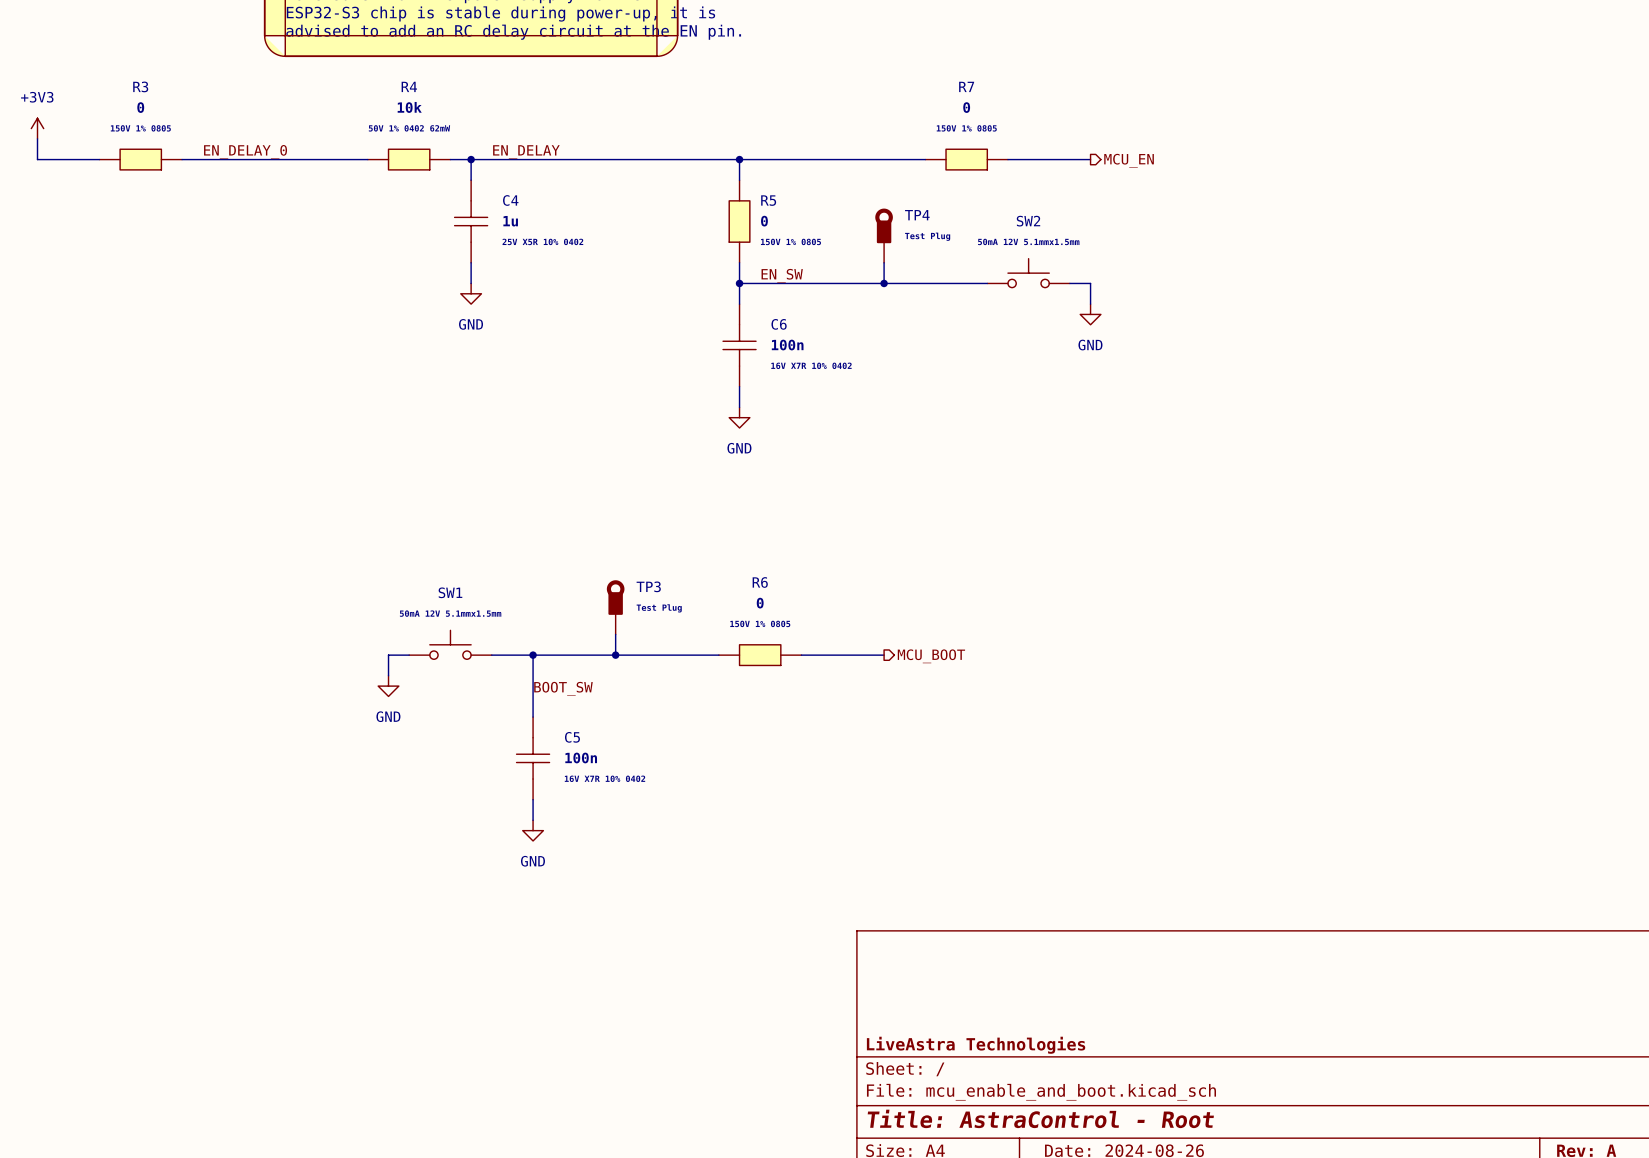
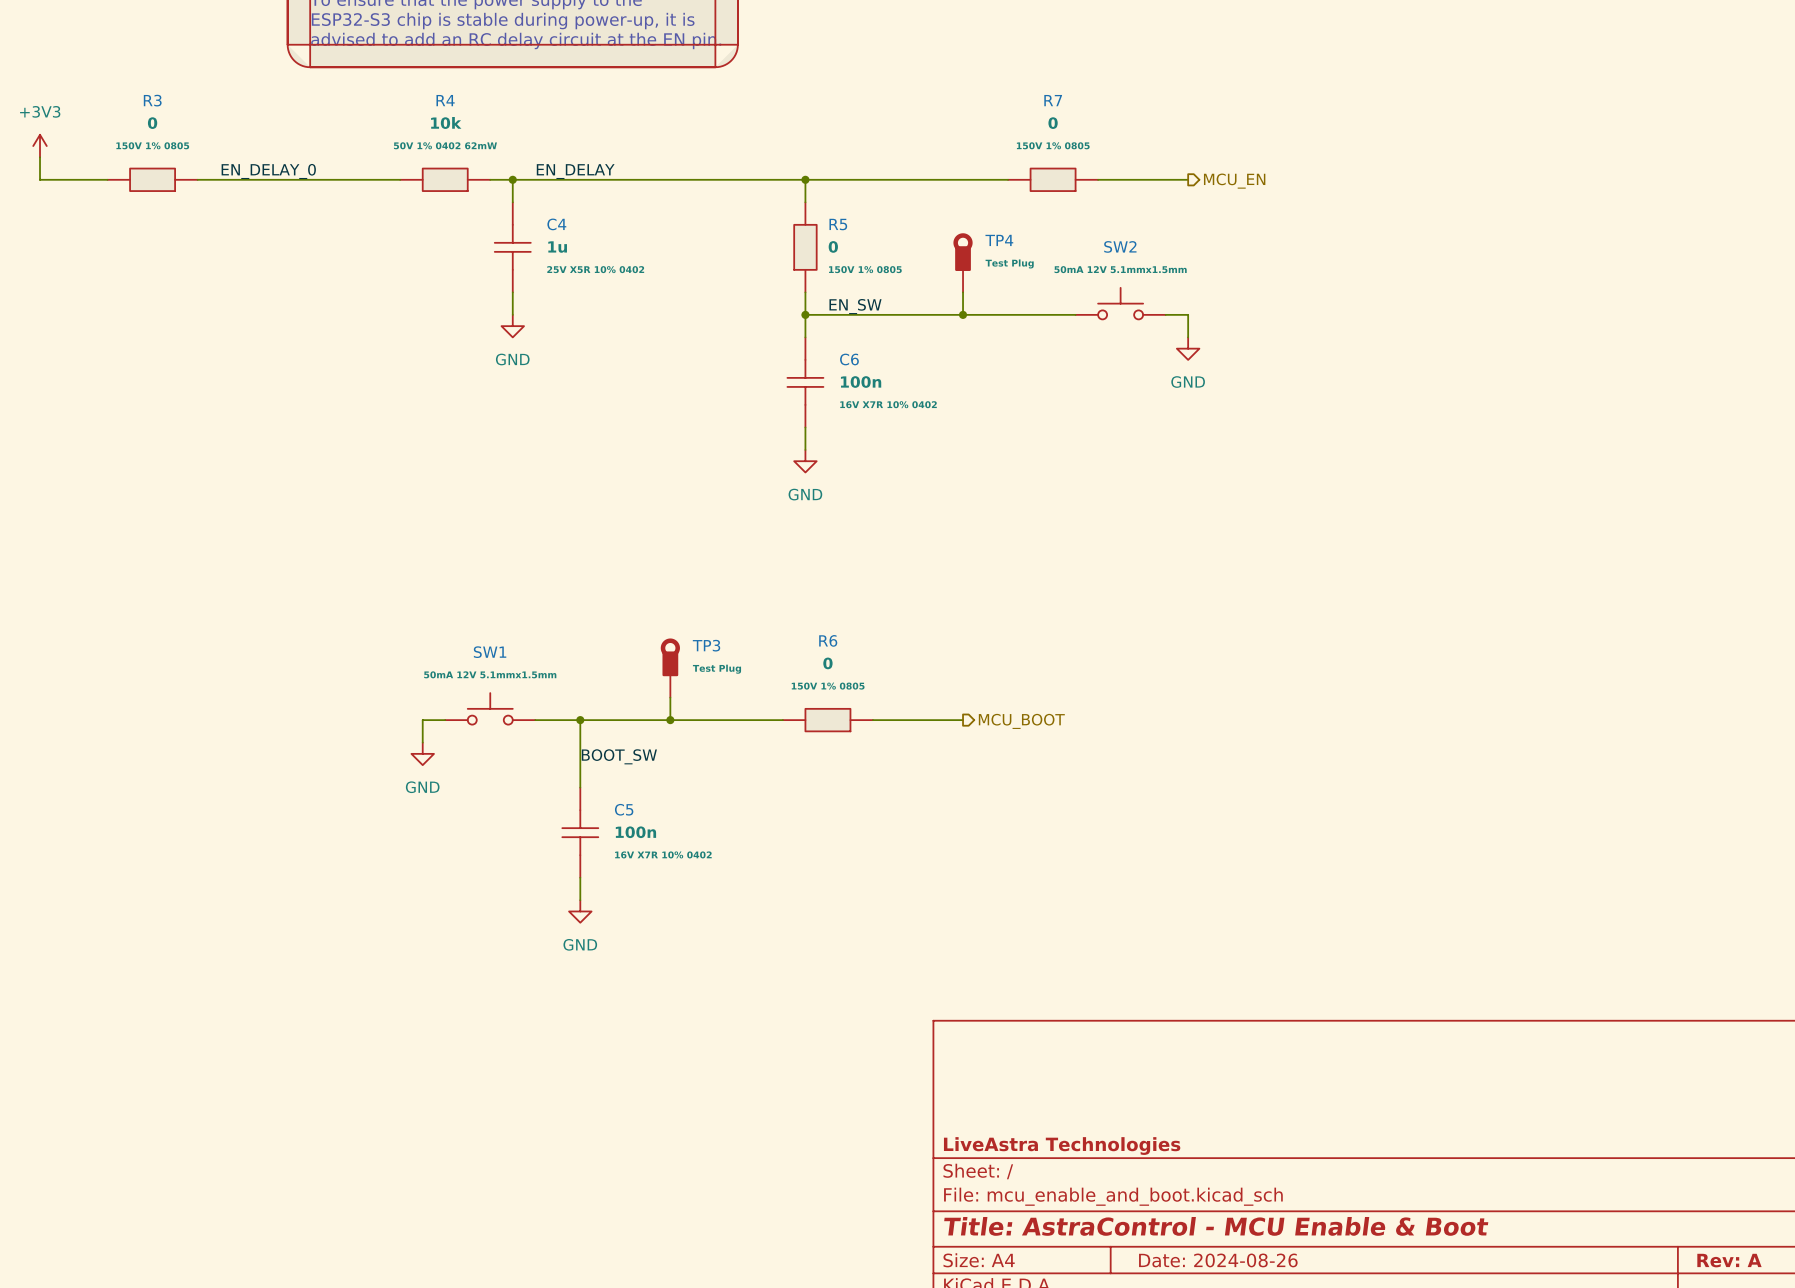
title block: Title: AstraControl - Root (1040, 1118) -> Title: AstraControl - MCU Enable & Boot (1216, 1226)

